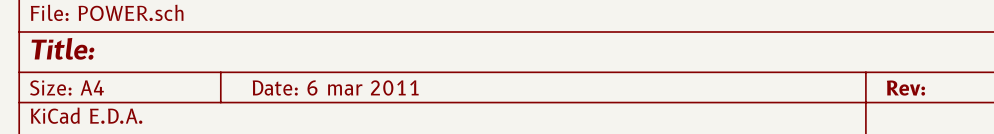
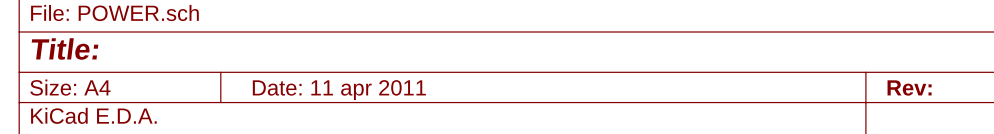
title block: Date: 6 mar 2011 (335, 87) -> Date: 11 apr 2011 (339, 90)

